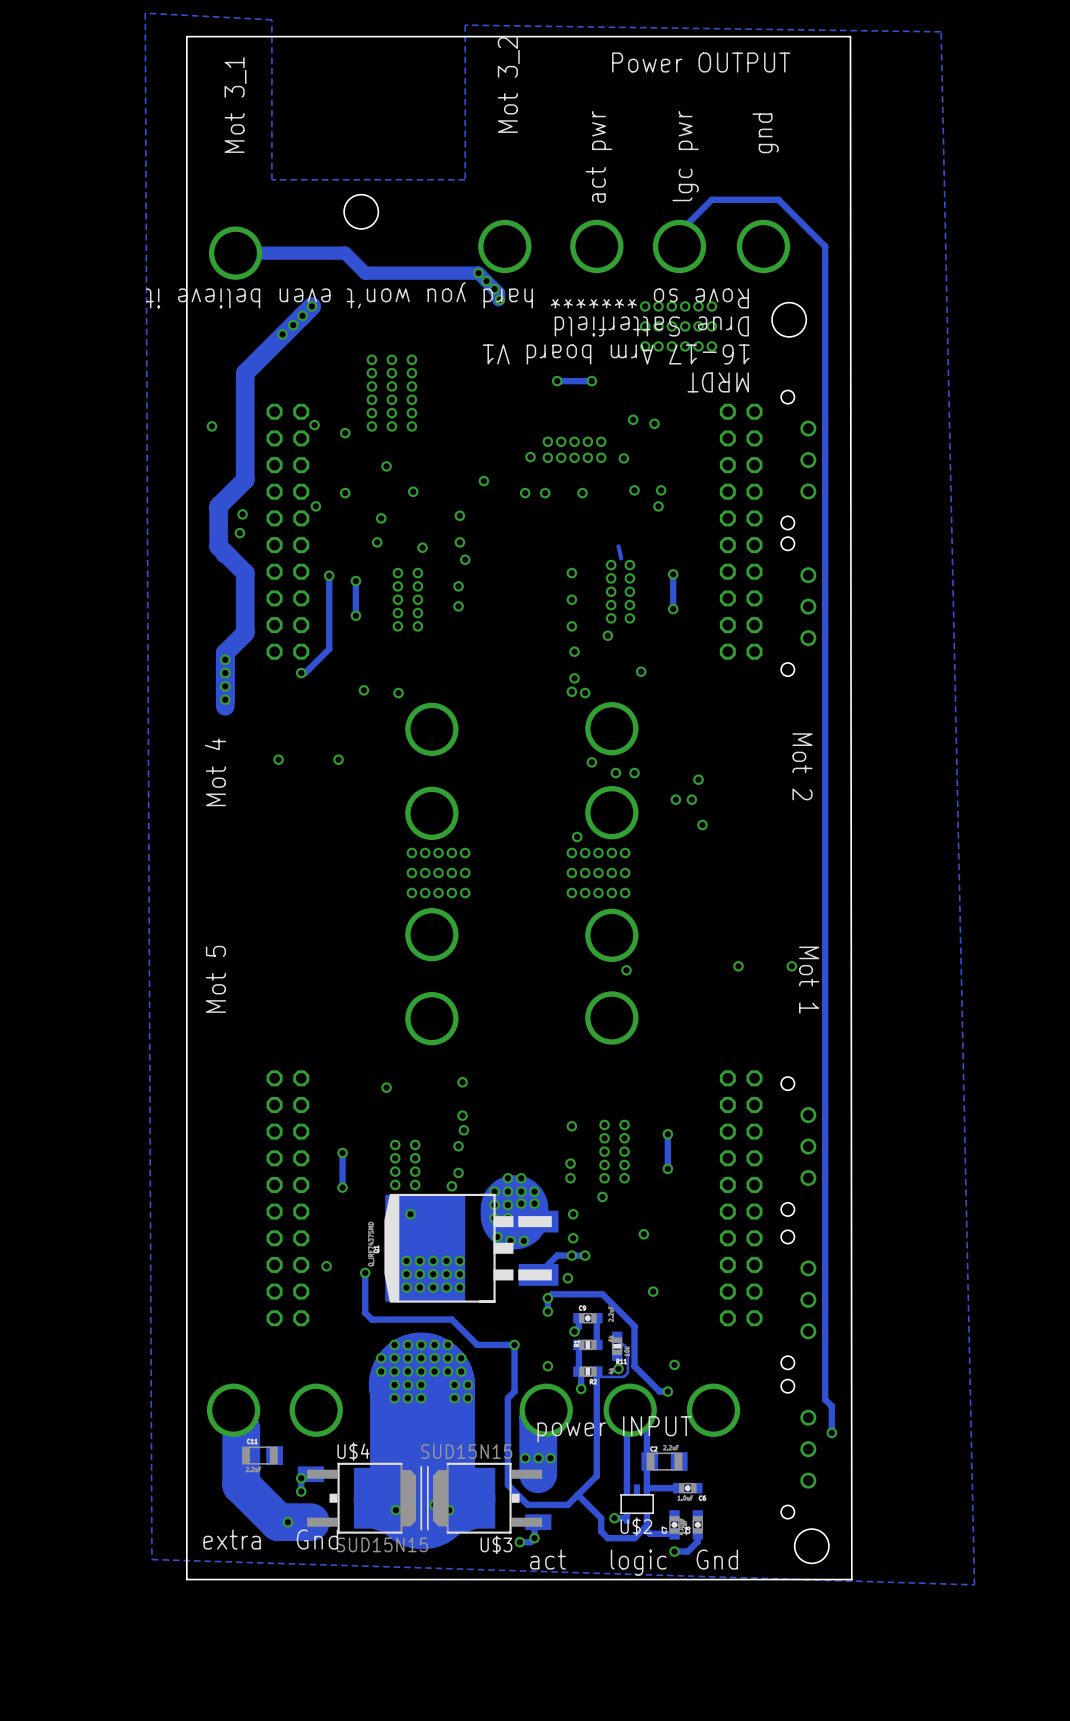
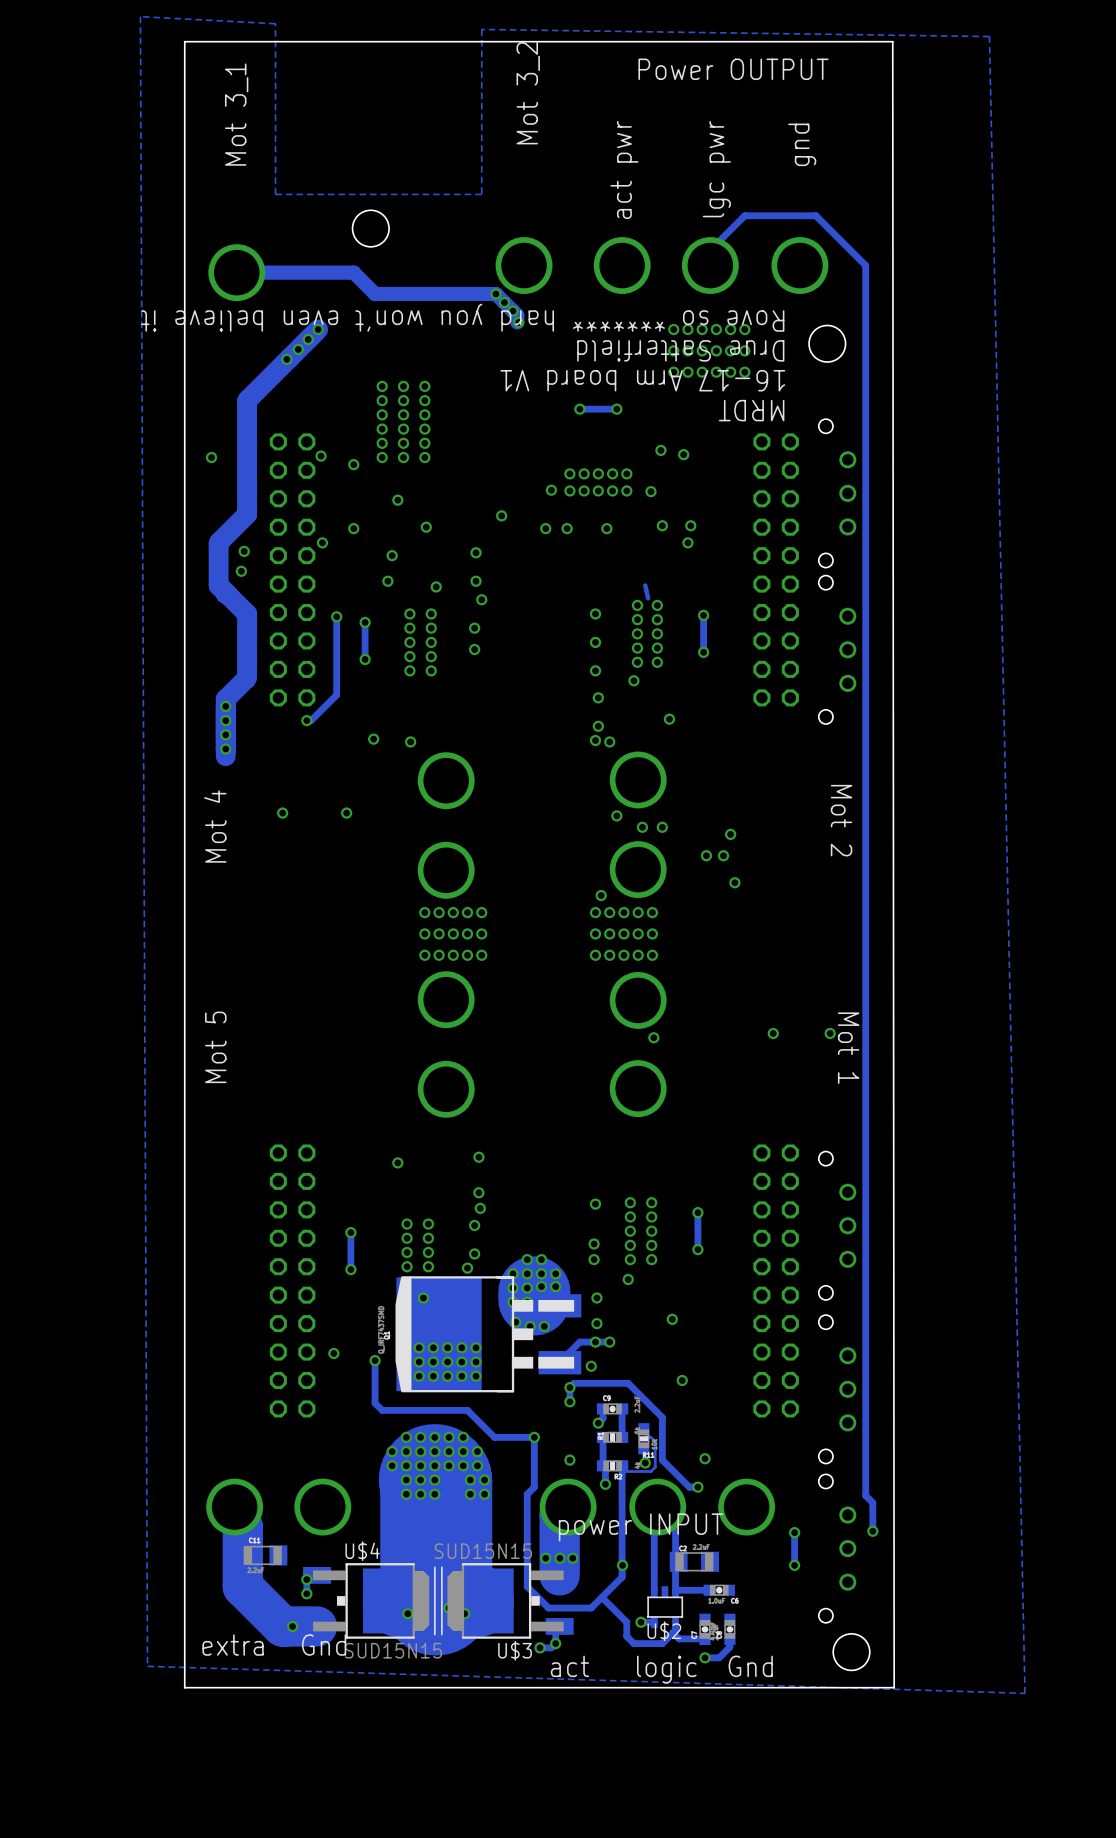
track: none -> (794, 1532) (794, 1565)
via: none -> (794, 1532)
via: none -> (622, 1565)
via: none -> (794, 1565)

